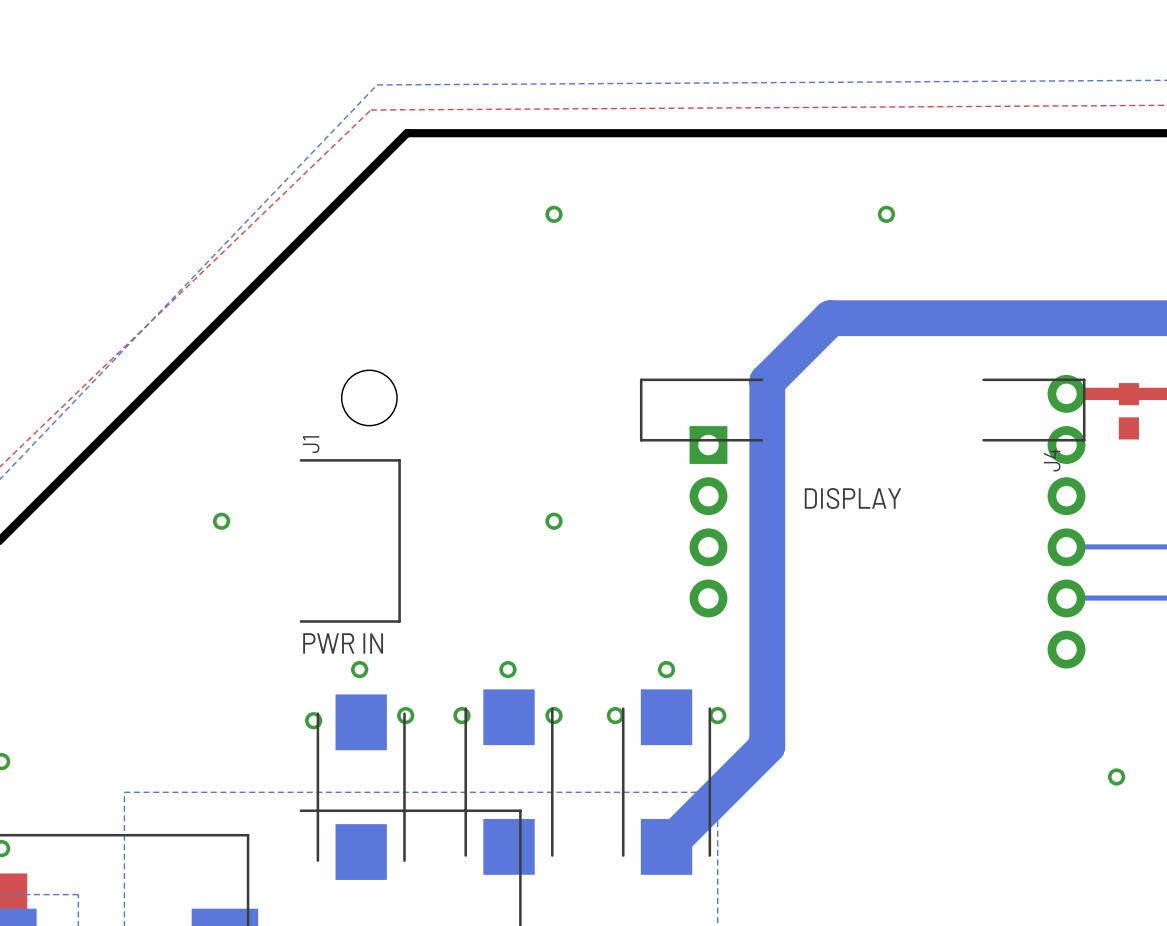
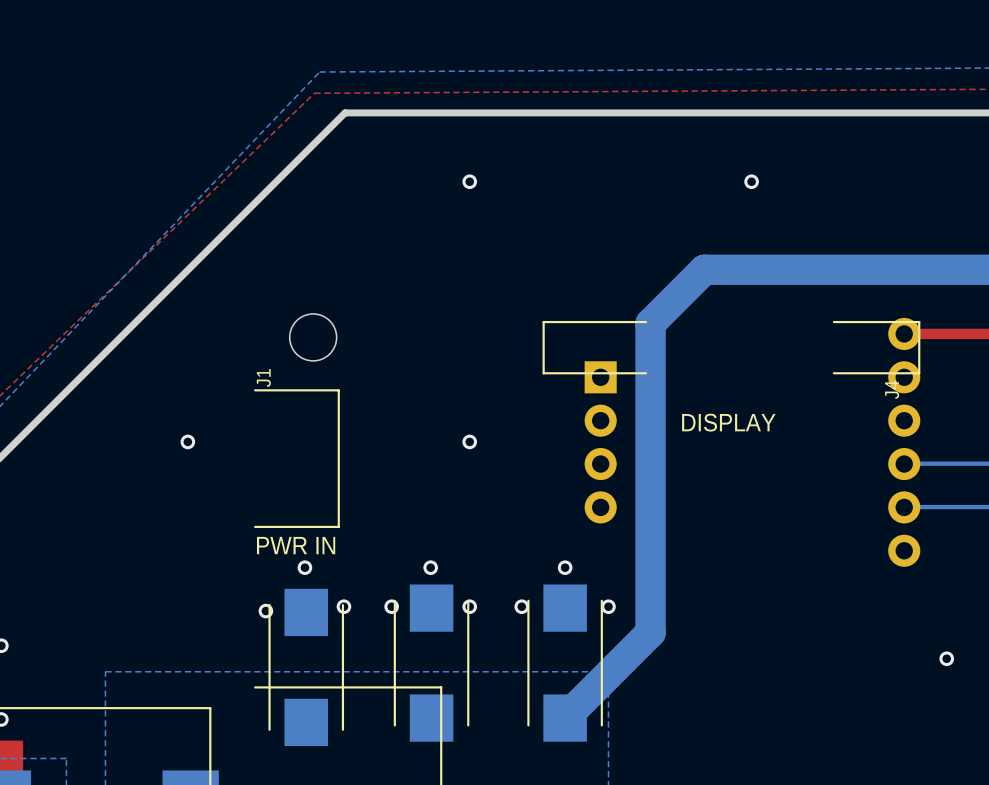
part: (1128, 411) -> none

